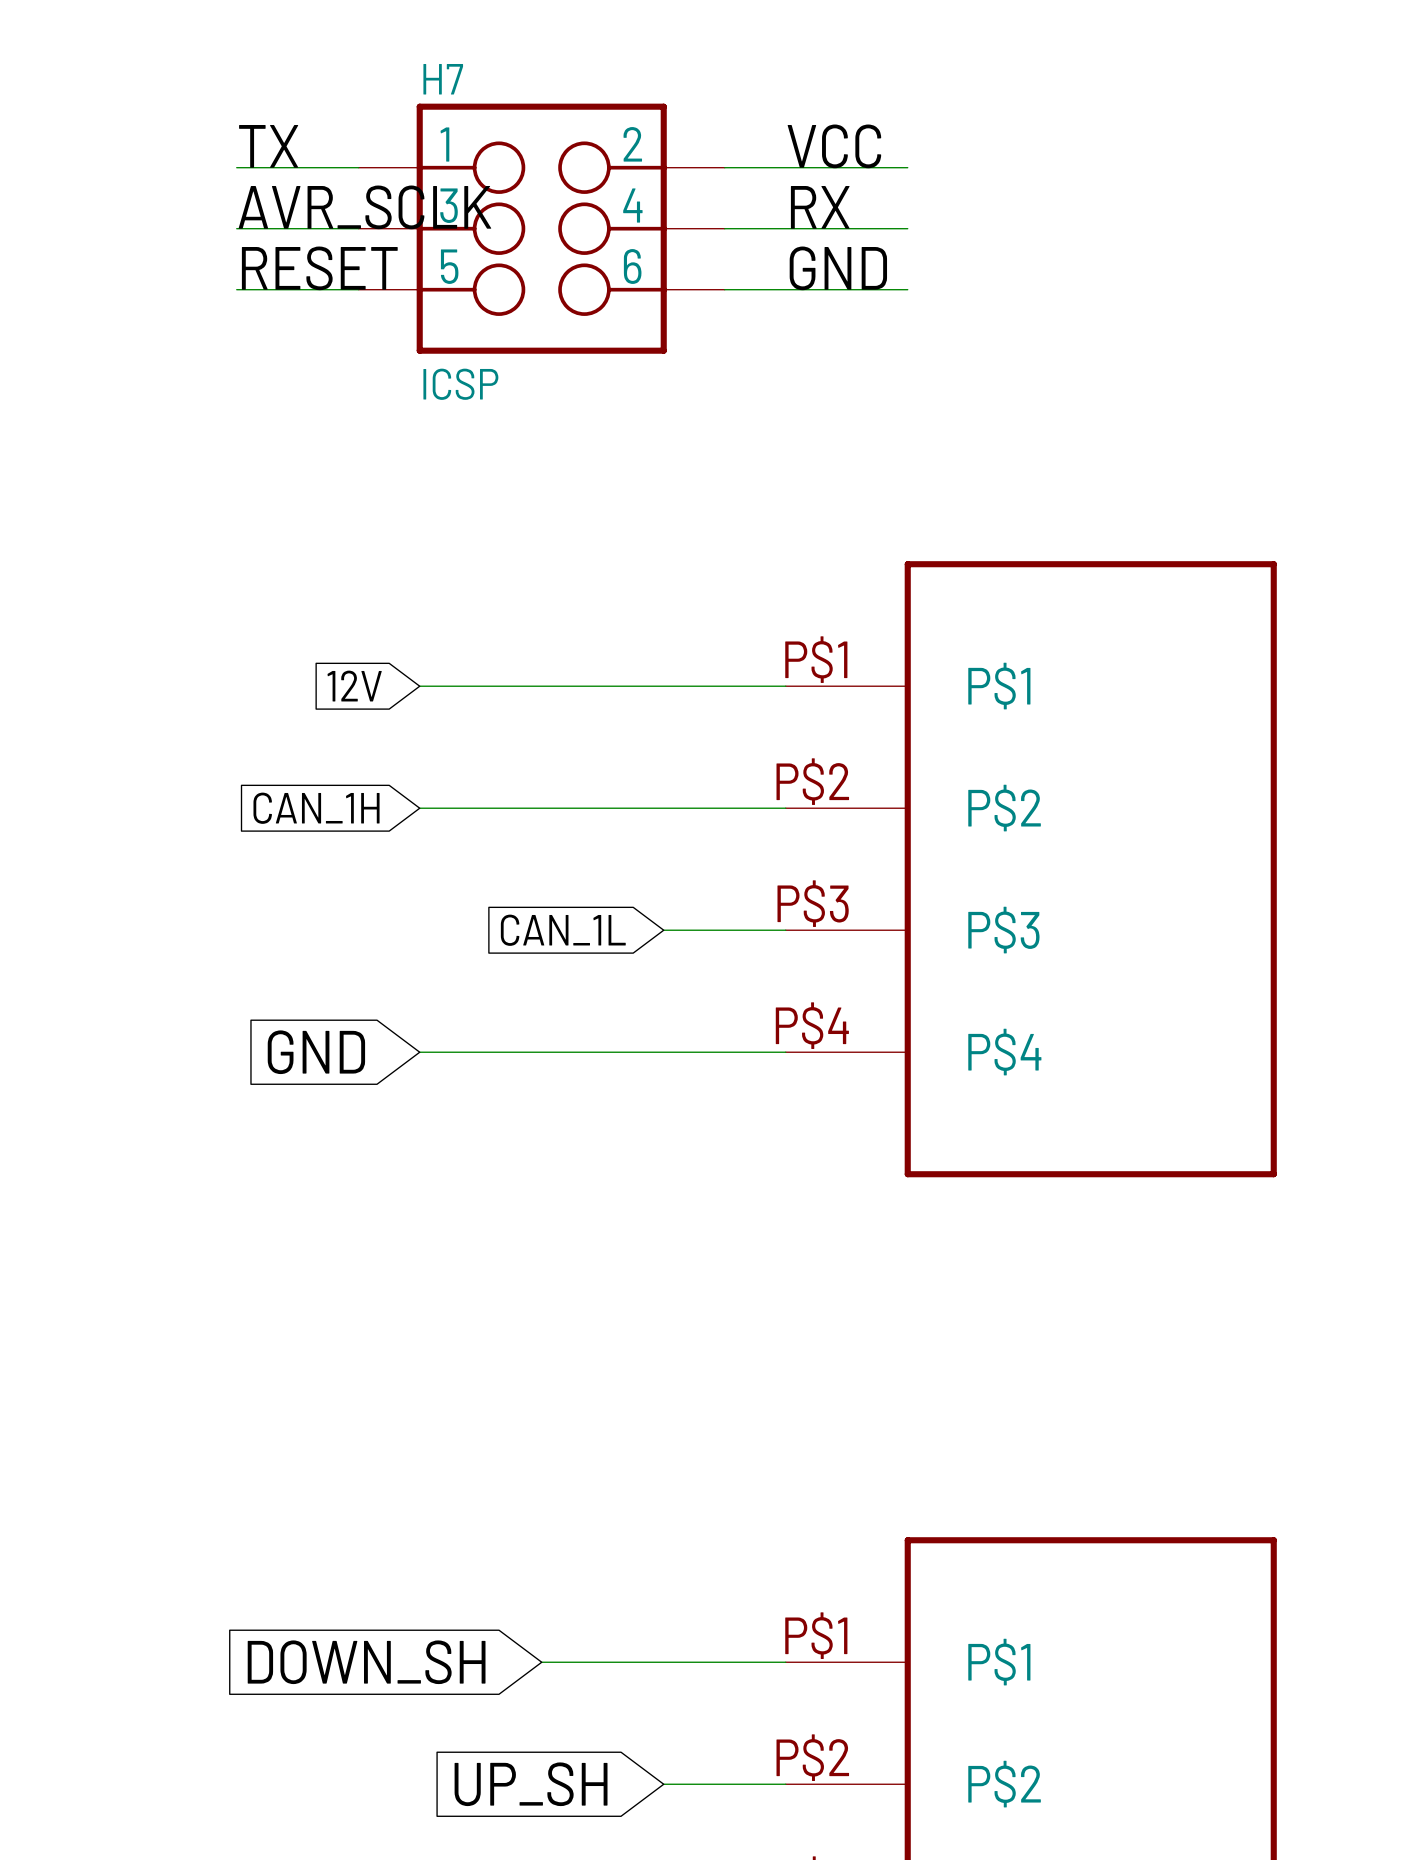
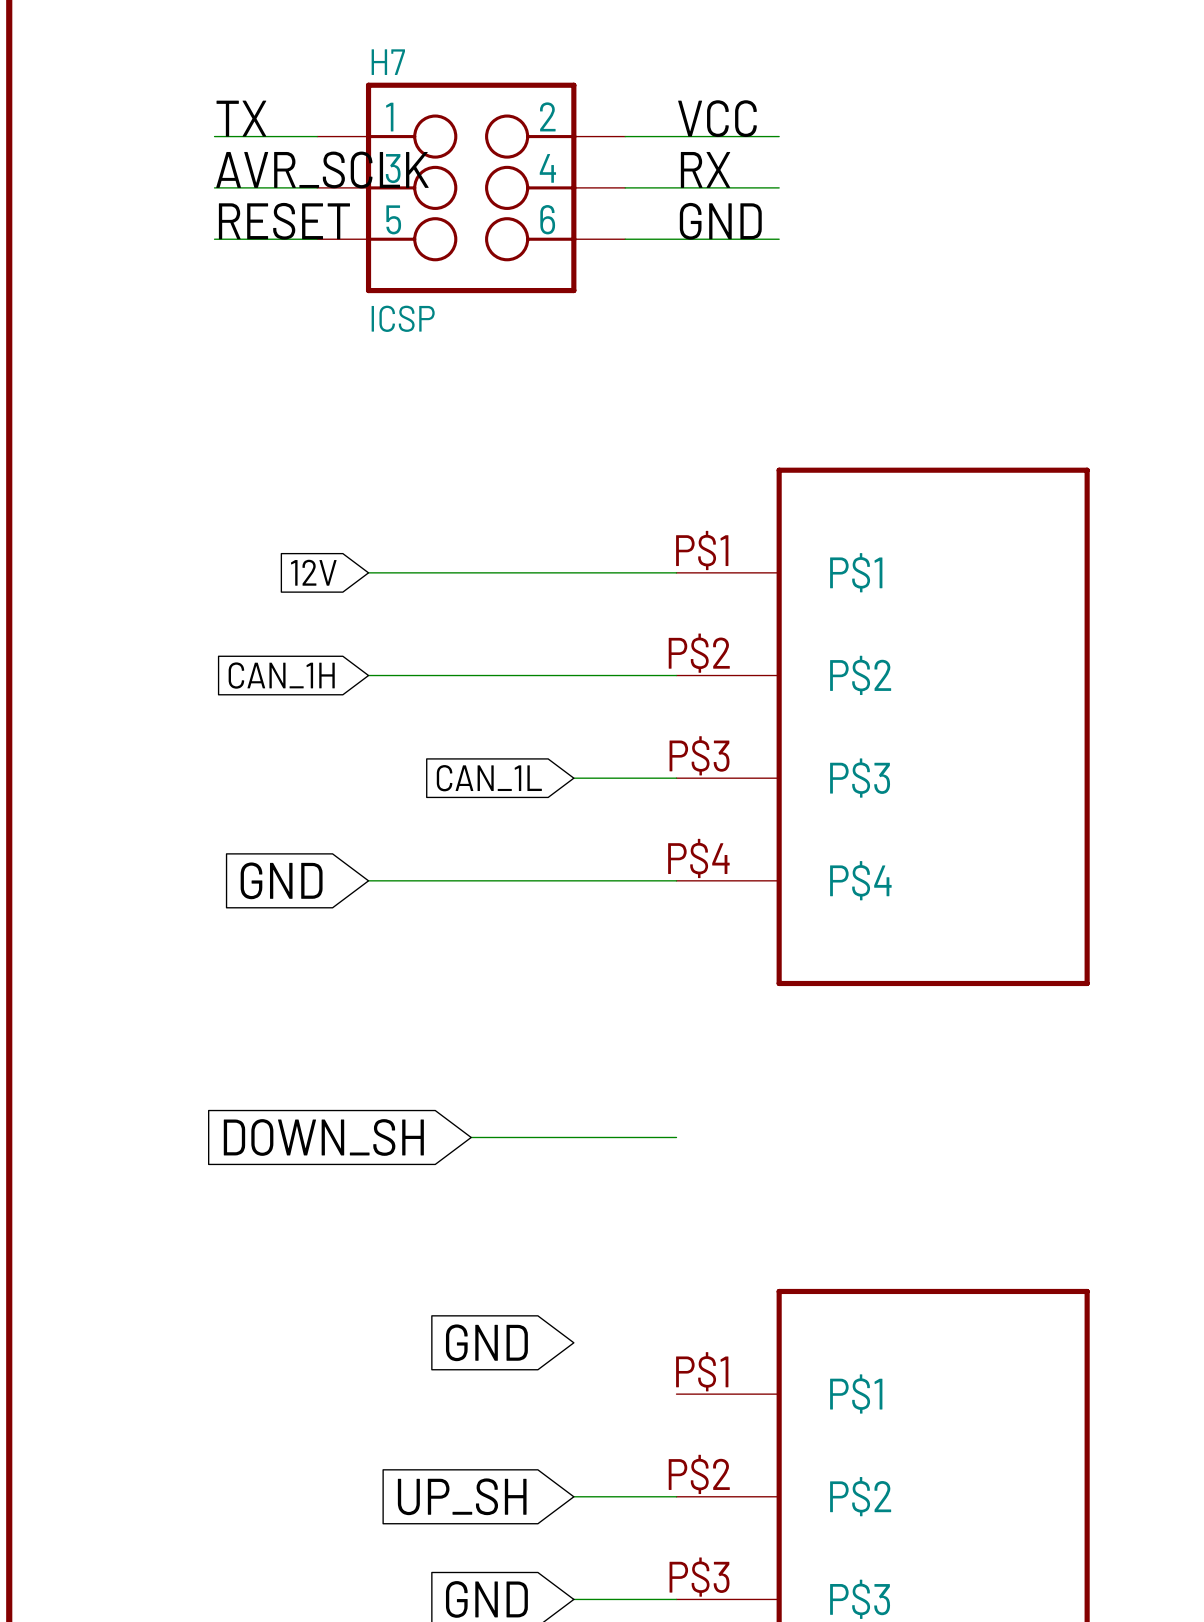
global label: none -> GND (486, 1342)
global label position: DOWN_SH (366, 1662) -> DOWN_SH (323, 1137)
wire: (541, 1662) (785, 1662) -> (471, 1137) (676, 1137)

